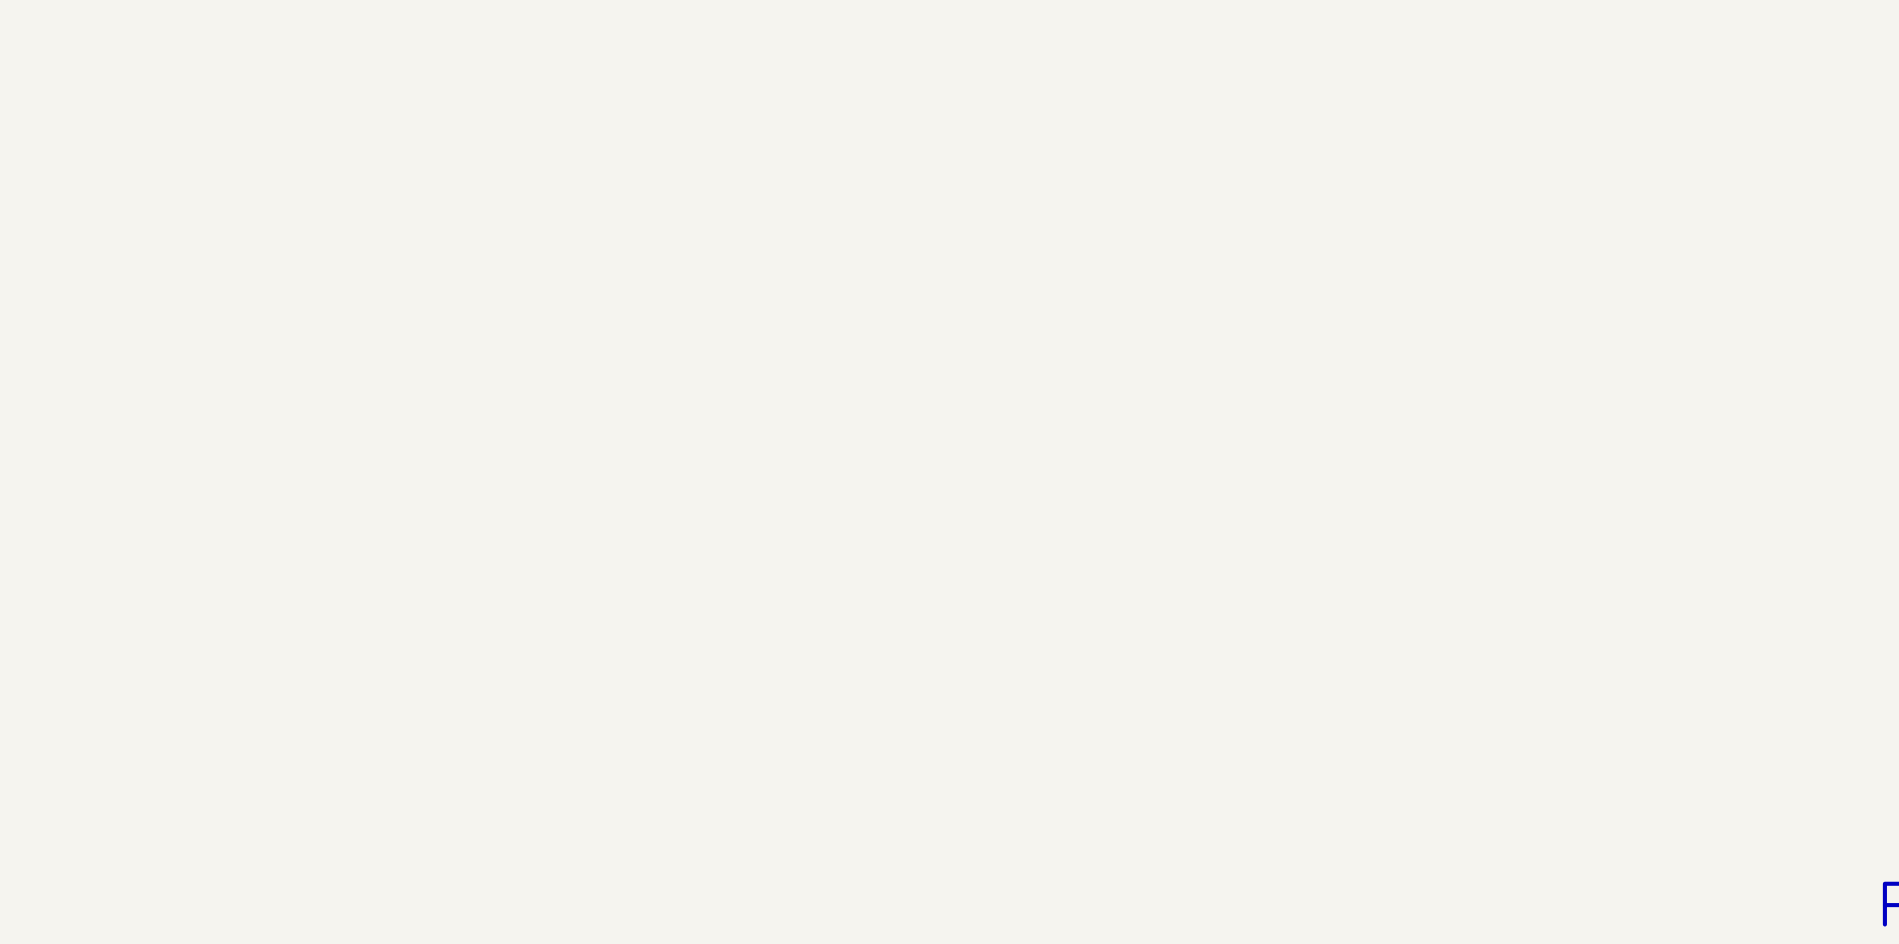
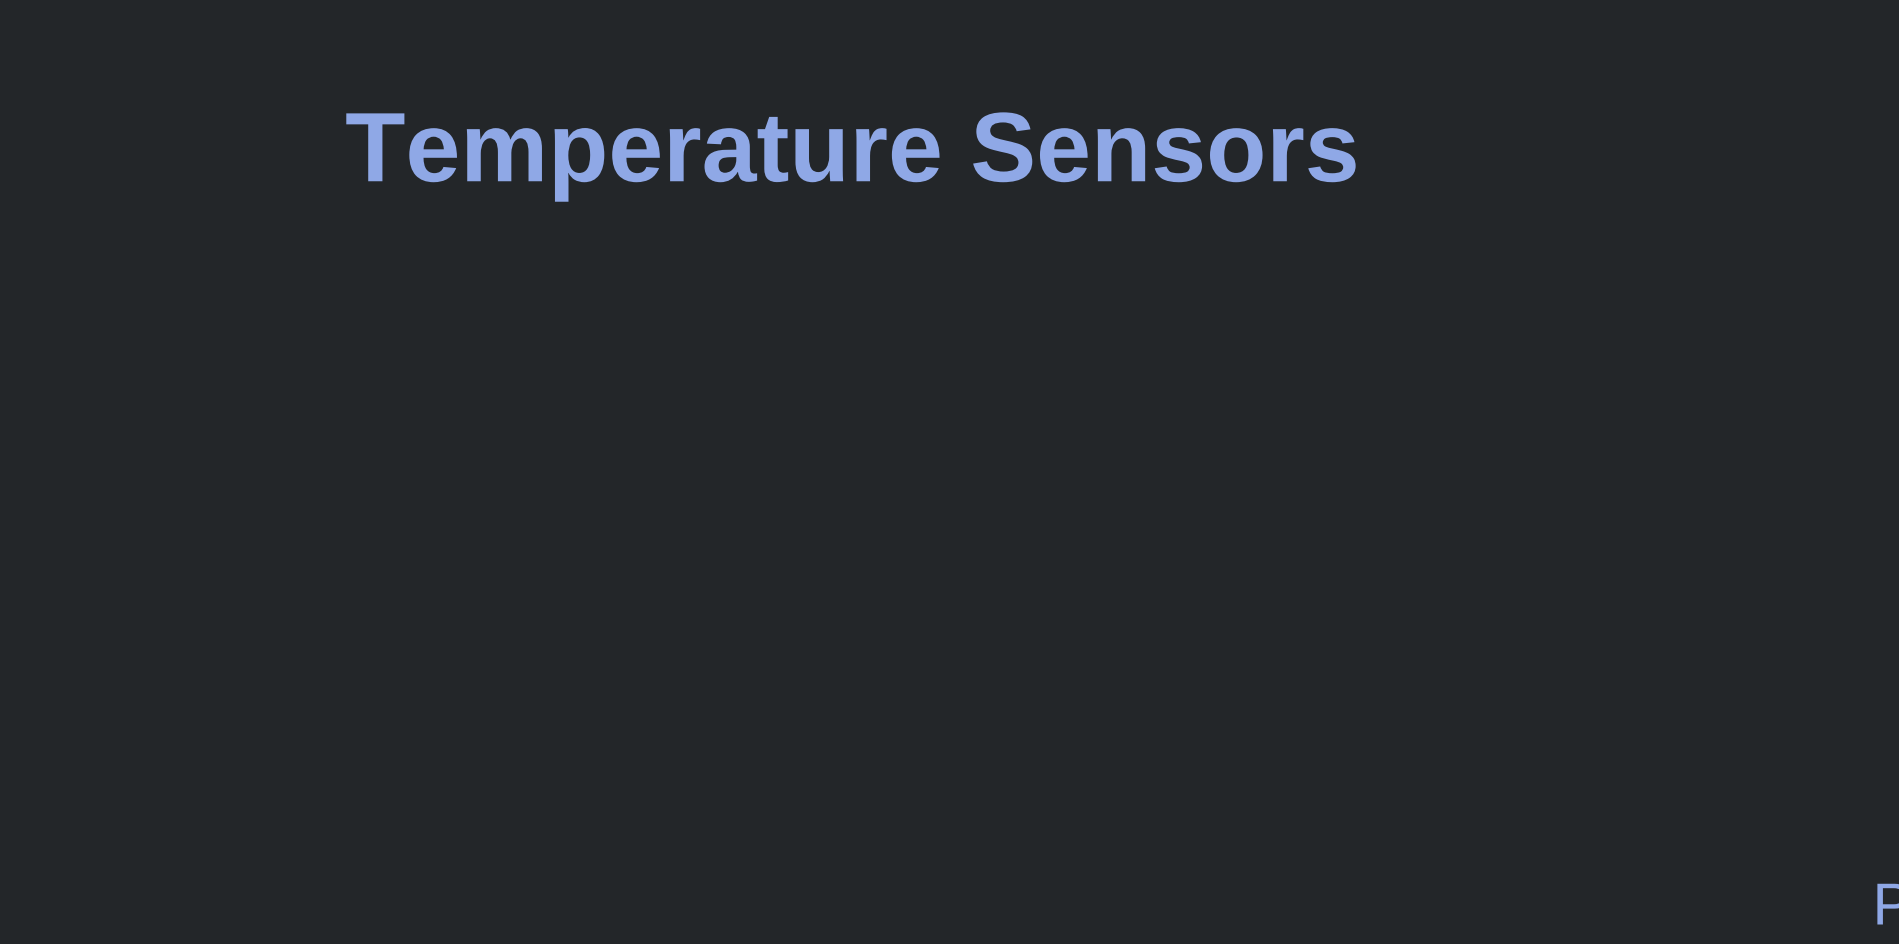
text: none -> Temperature Sensors (850, 157)

